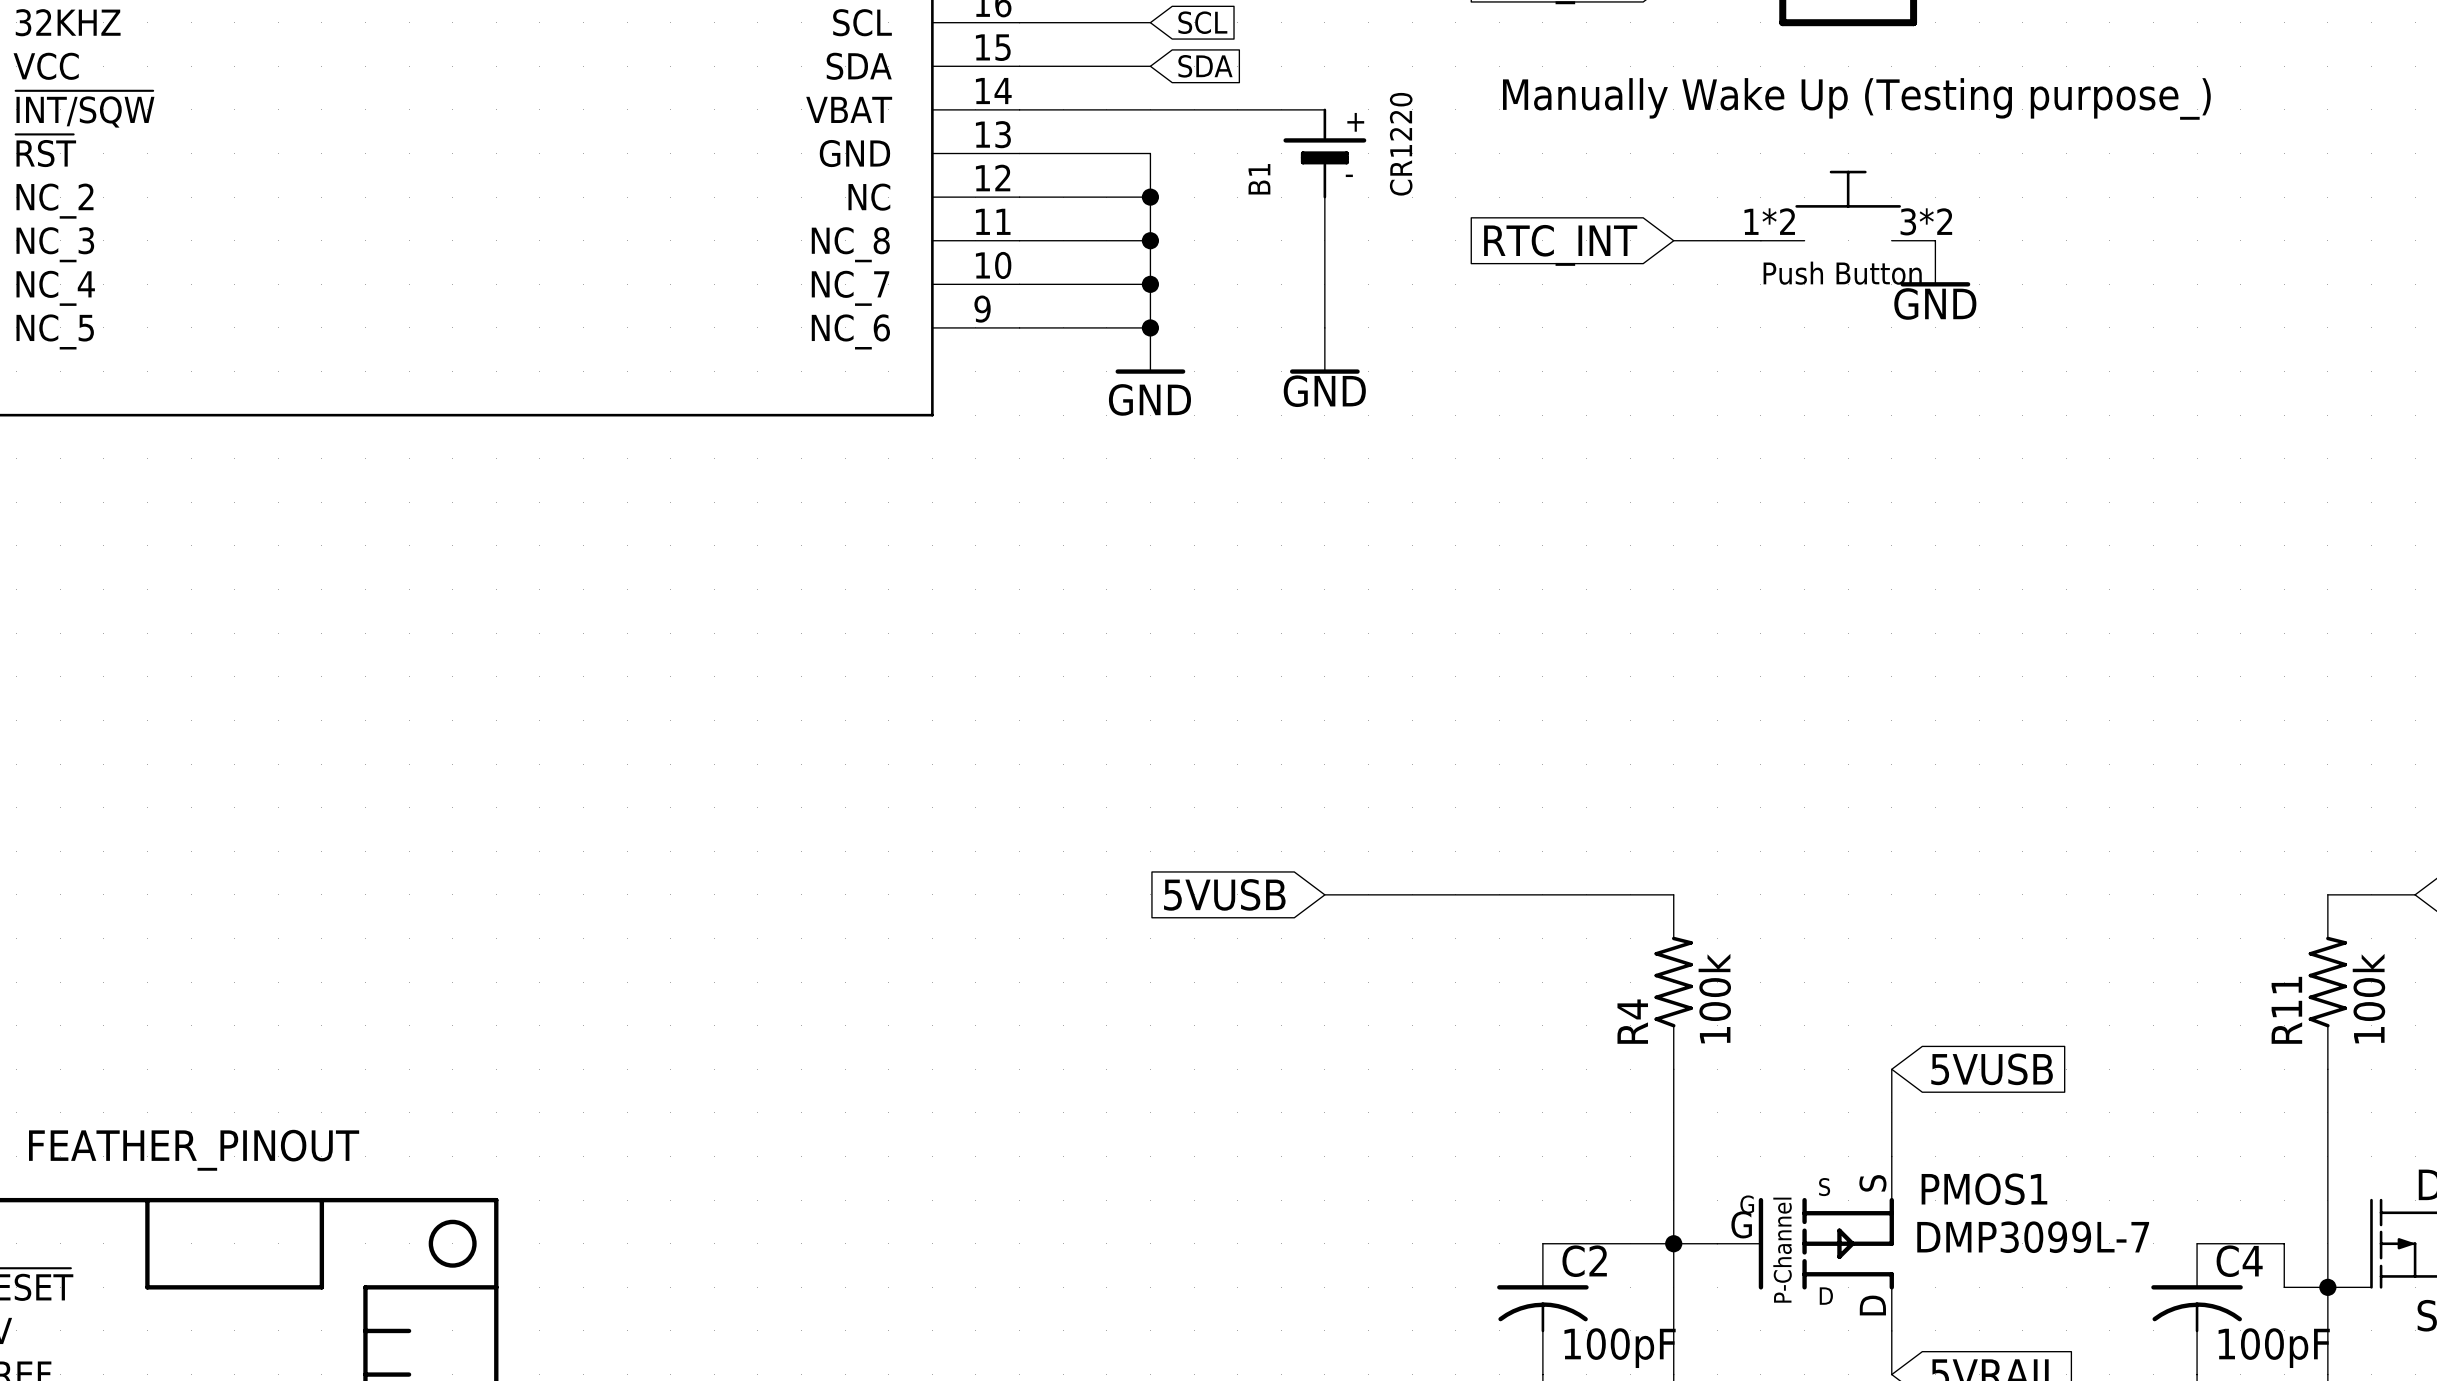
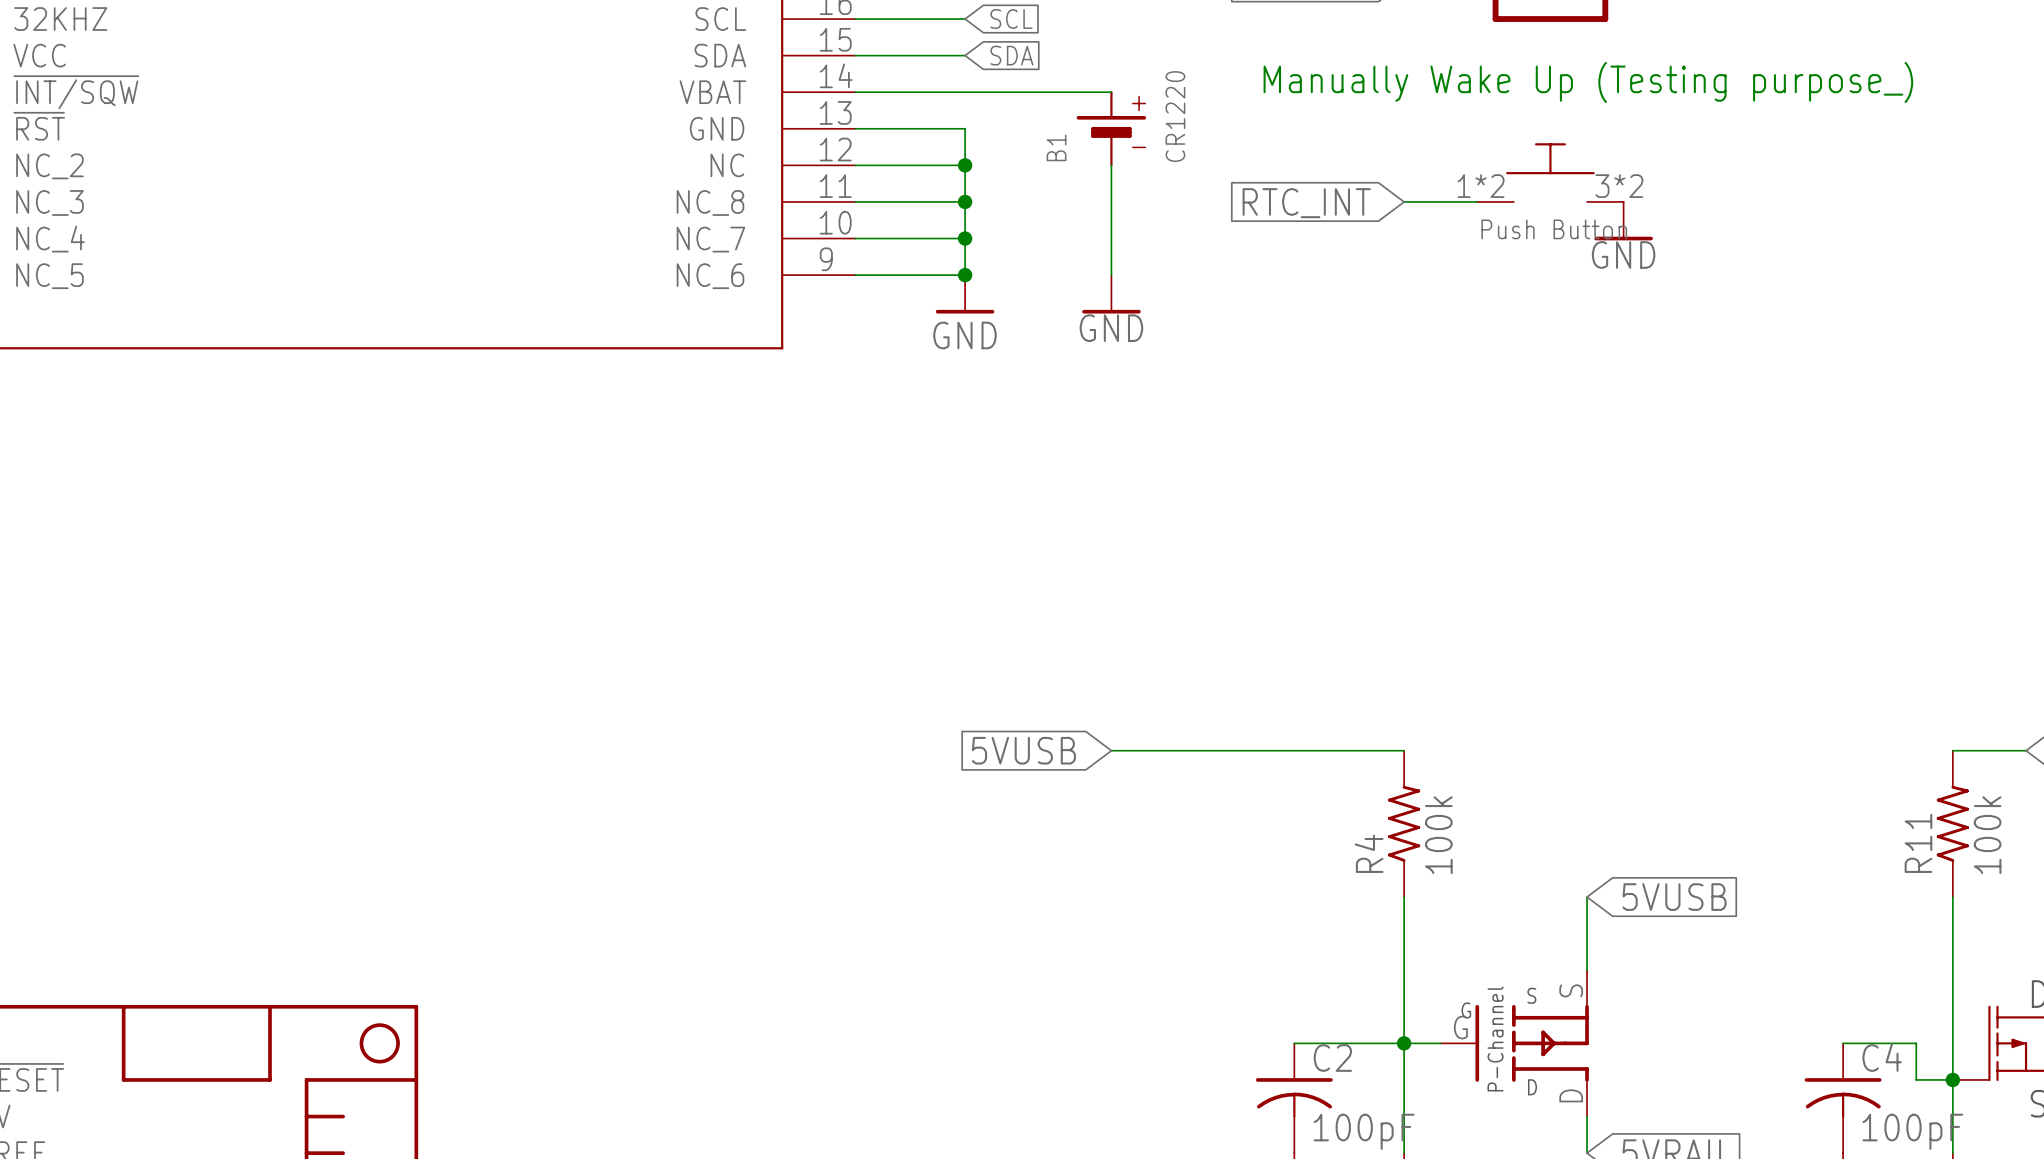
part value: FEATHER_PINOUT (194, 1150) -> none
PMOS1: DMP3099L-7 (1805, 1243) -> none

